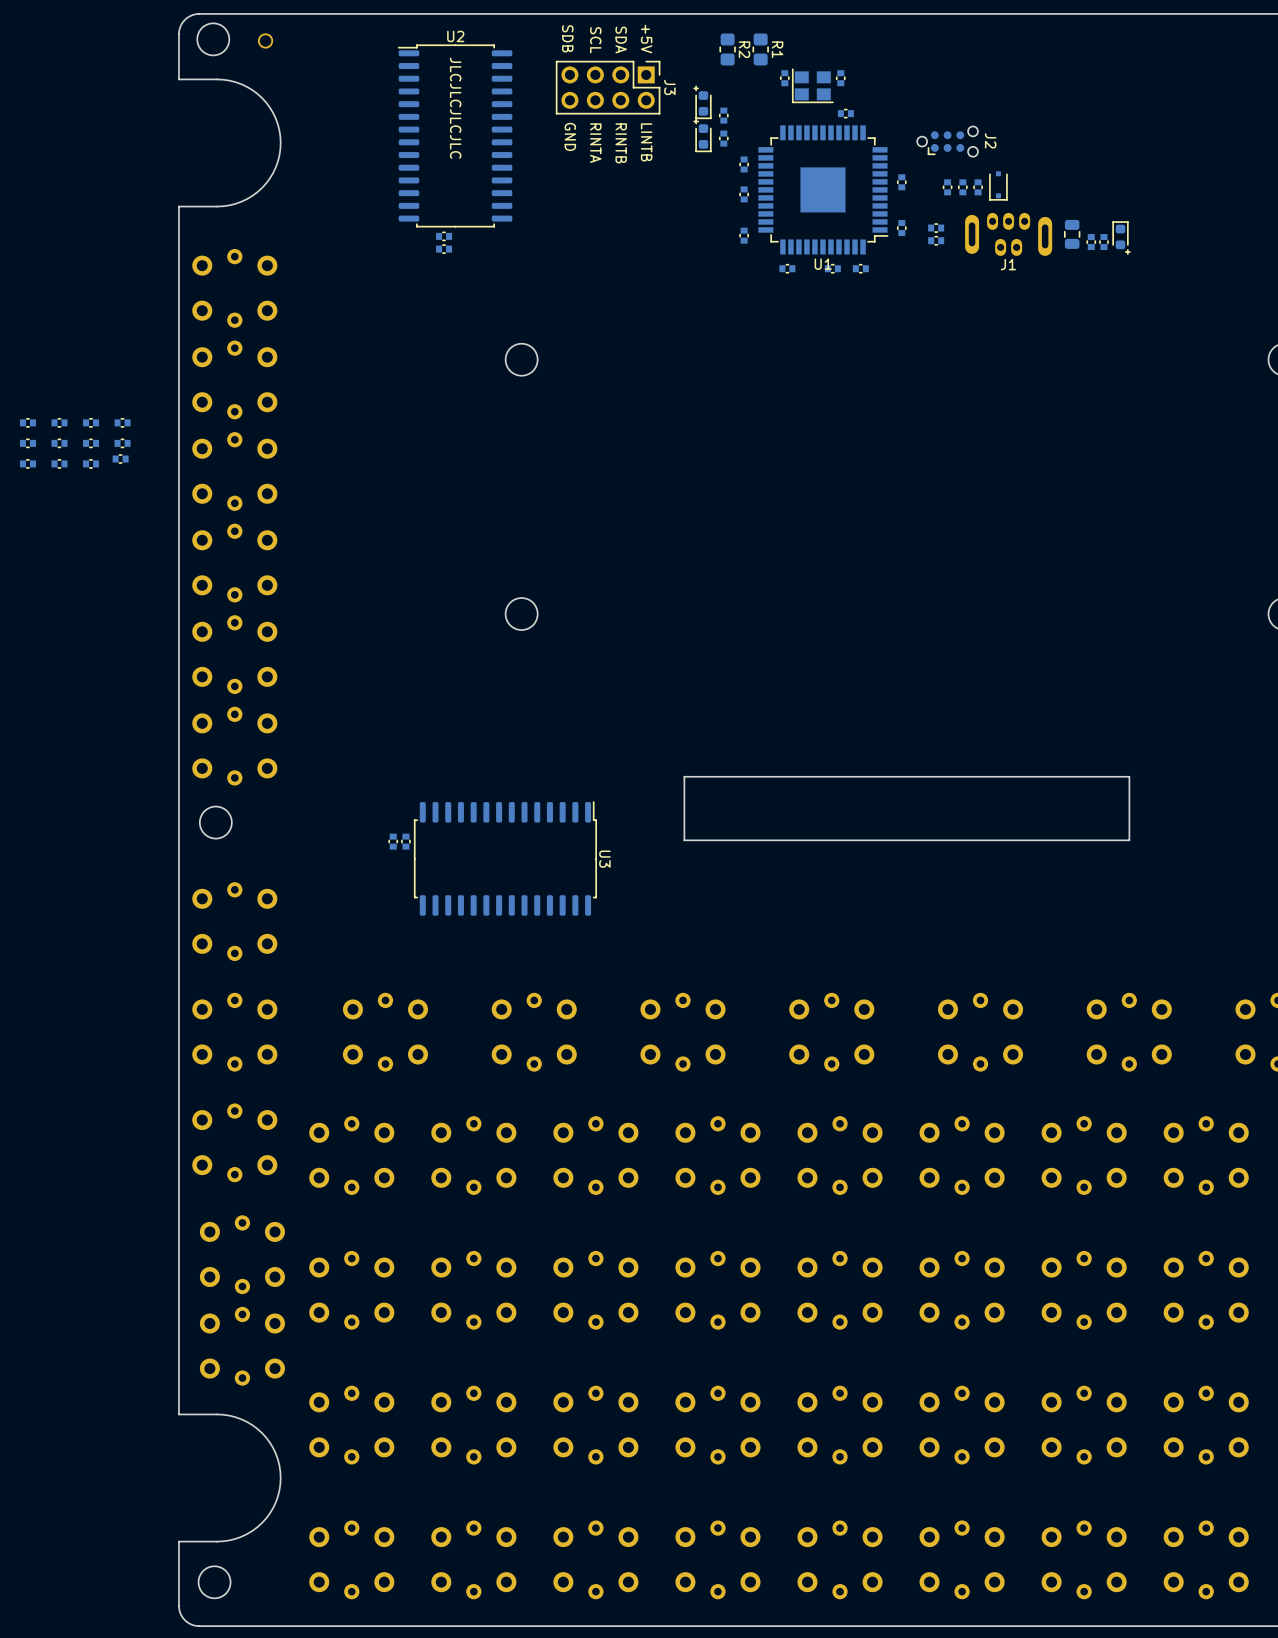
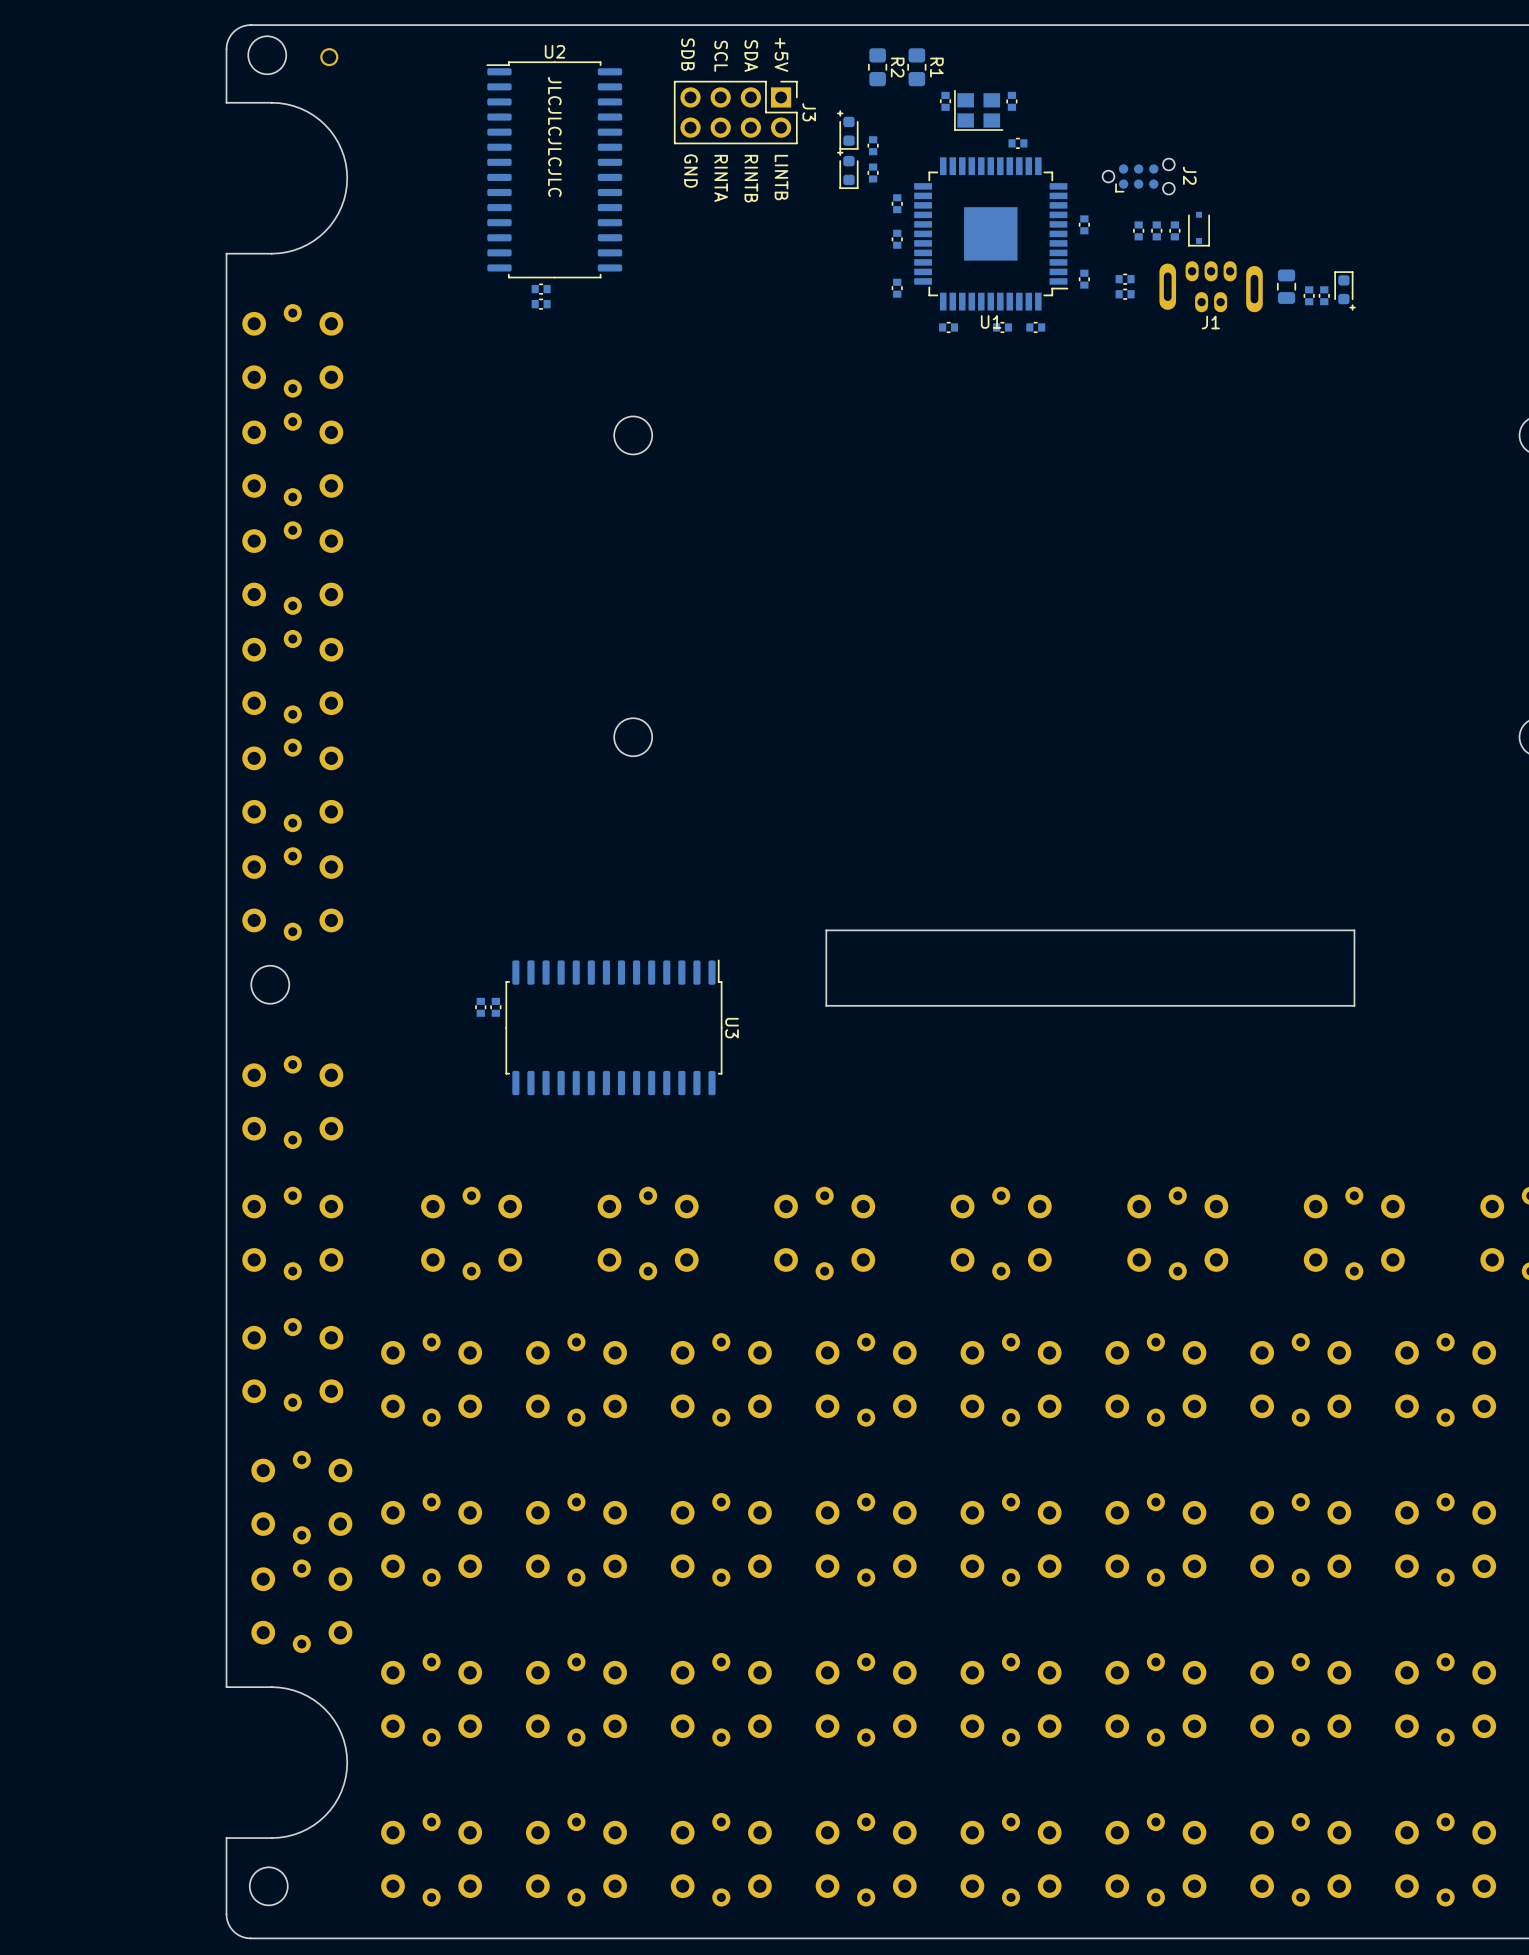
part: (27, 422) -> none
part: (59, 422) -> none
part: (91, 422) -> none
part: (122, 422) -> none
part: (27, 443) -> none
part: (59, 443) -> none
part: (91, 443) -> none
part: (122, 443) -> none
part: (120, 458) -> none
part: (27, 463) -> none
part: (59, 463) -> none
part: (91, 463) -> none

